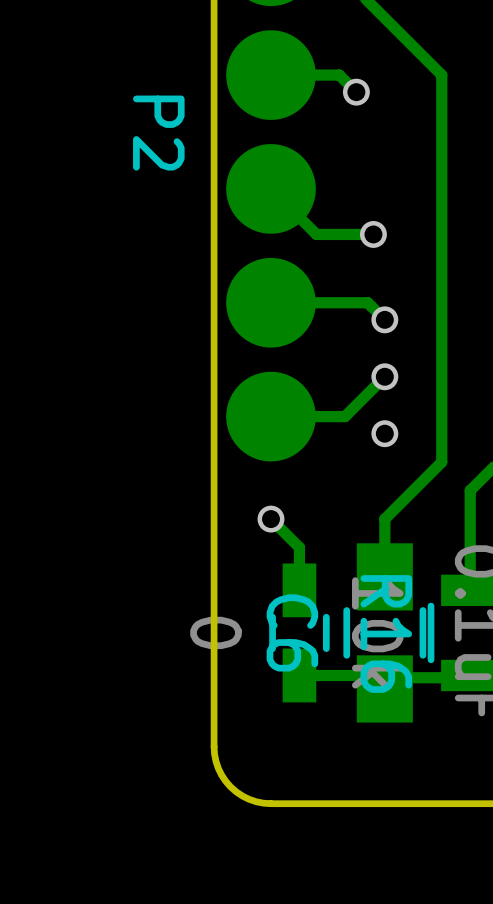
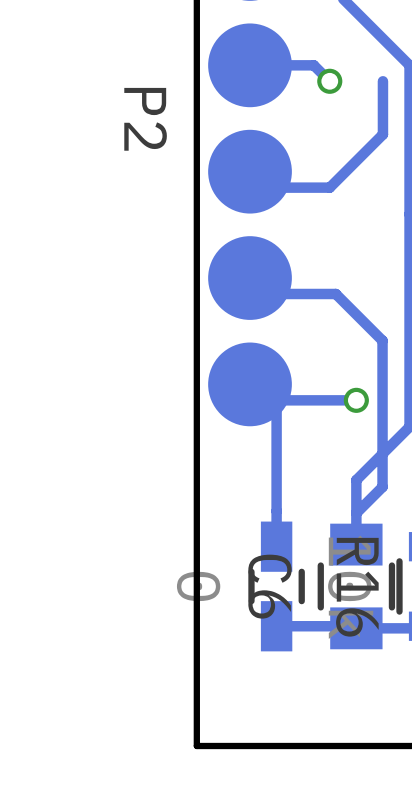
track: none -> (382, 81) (382, 134) (329, 187) (276, 187)
track: (271, 188) (316, 234) (373, 234) -> none
via: (373, 234) -> none
track: (271, 302) (367, 302) (384, 319) -> none
track: none -> (276, 293) (335, 293) (382, 340) (382, 487) (356, 513)
via: (384, 319) -> none
track: (384, 376) (345, 416) (271, 416) -> none
via: (384, 376) -> none
track: (271, 519) (299, 547) -> (356, 400) (276, 400) (276, 506)
via: (271, 519) -> none
C6 footprint: [343, 543, 427, 723] -> [317, 523, 396, 650]
board edge: (214, 746) (218, 768) (230, 787) (249, 799) (271, 803) -> (196, 692) (196, 745) (250, 745)

